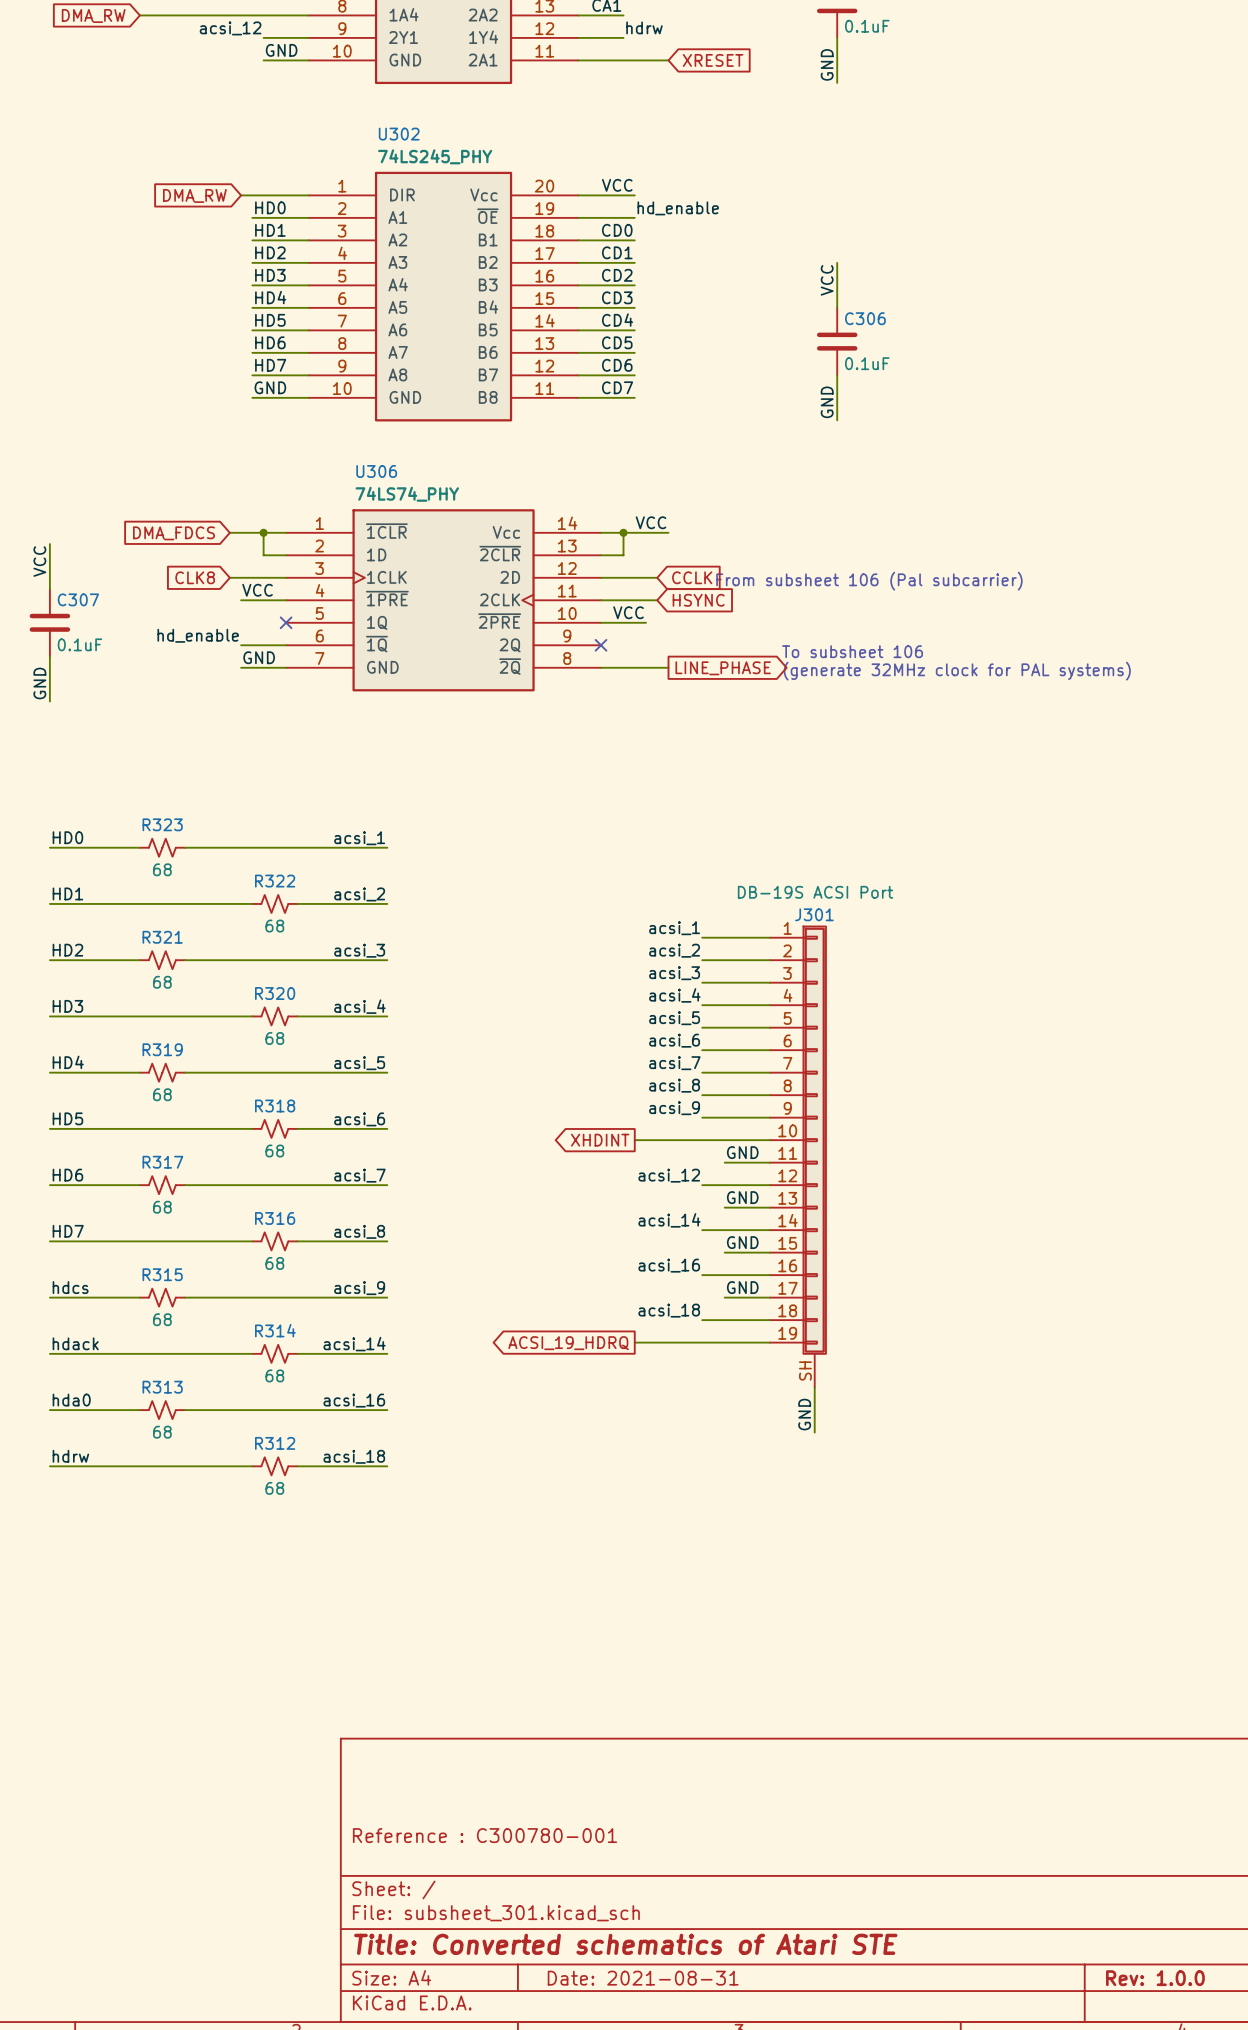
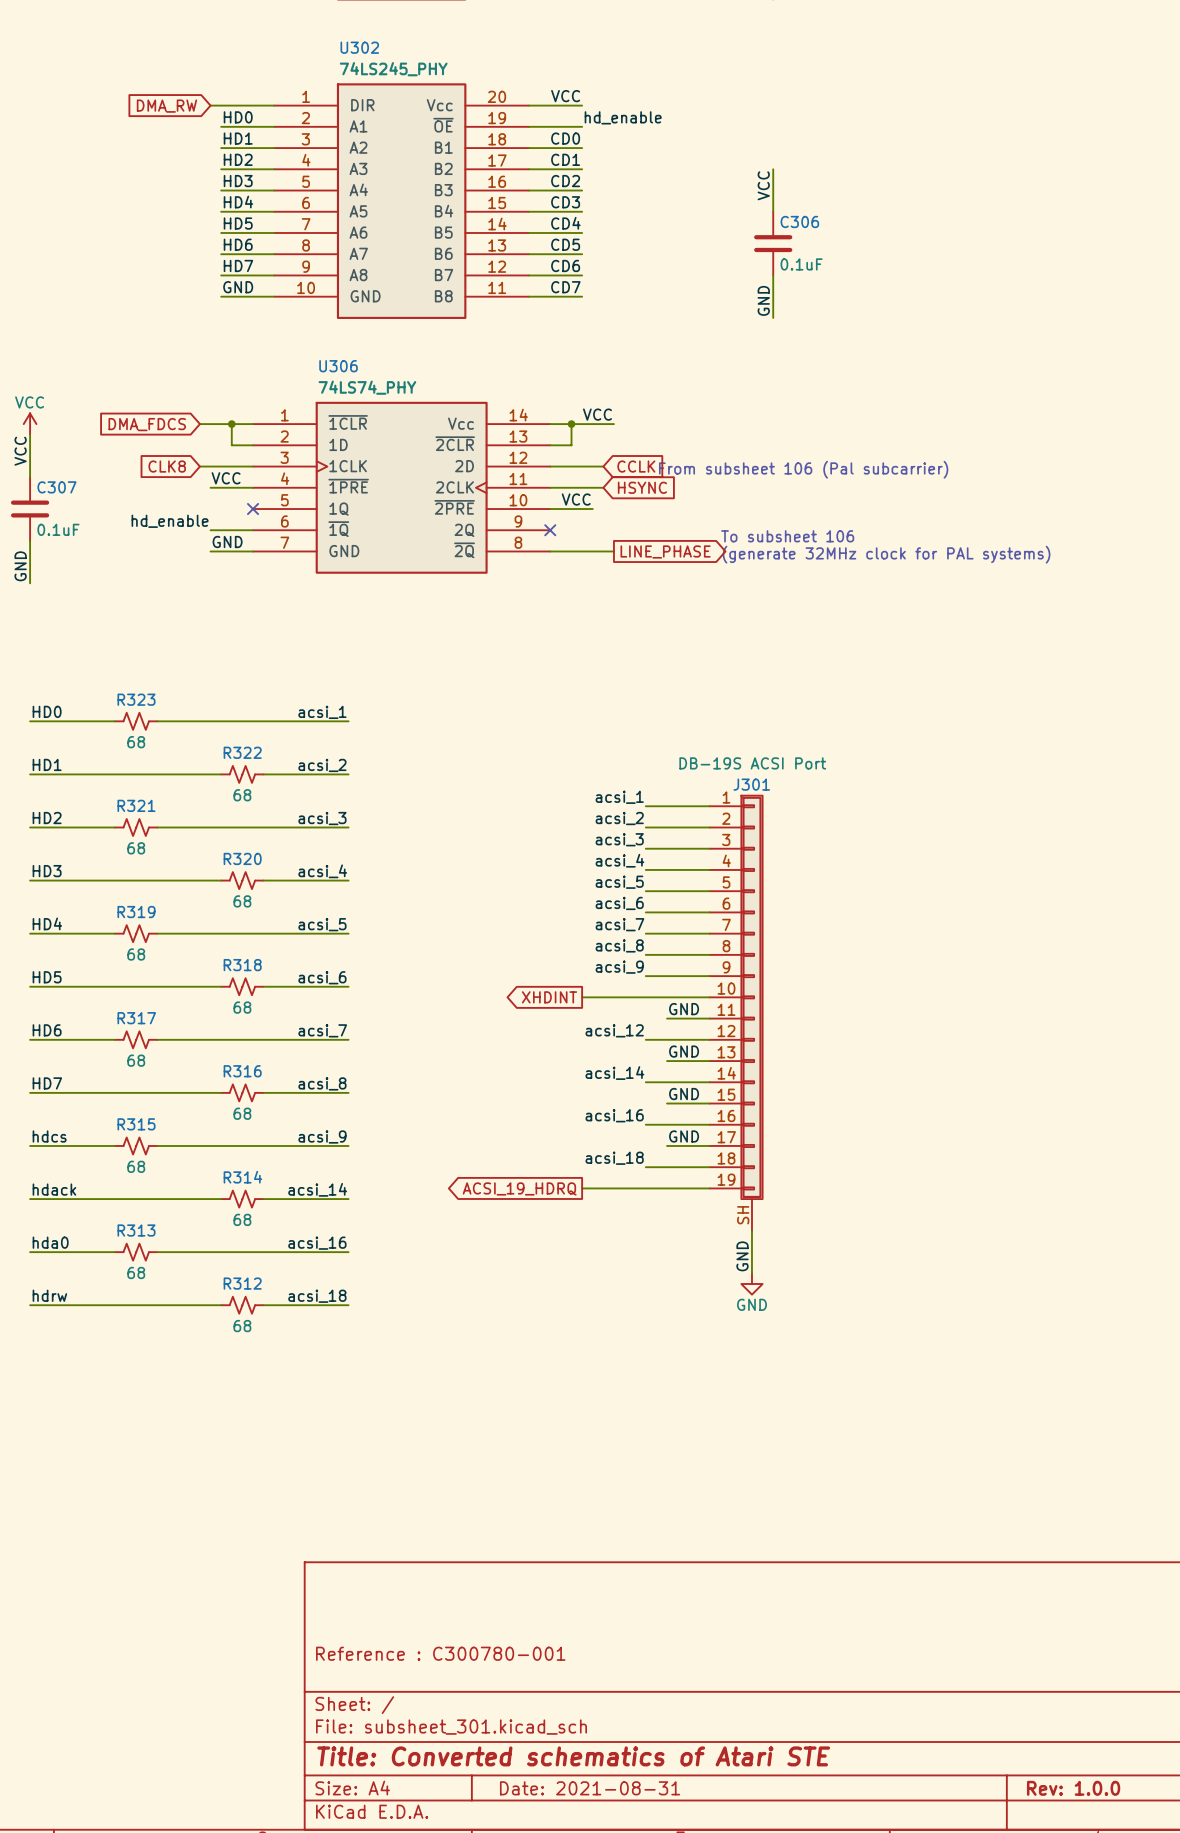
power symbol: none -> VCC (30, 424)
power symbol: none -> GND (751, 1283)

